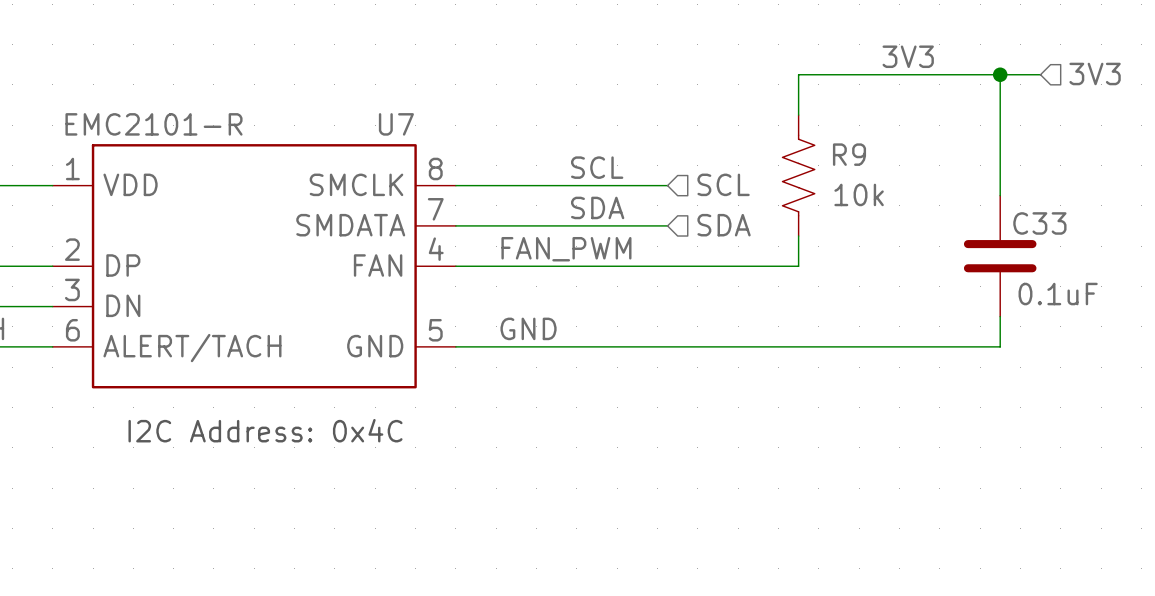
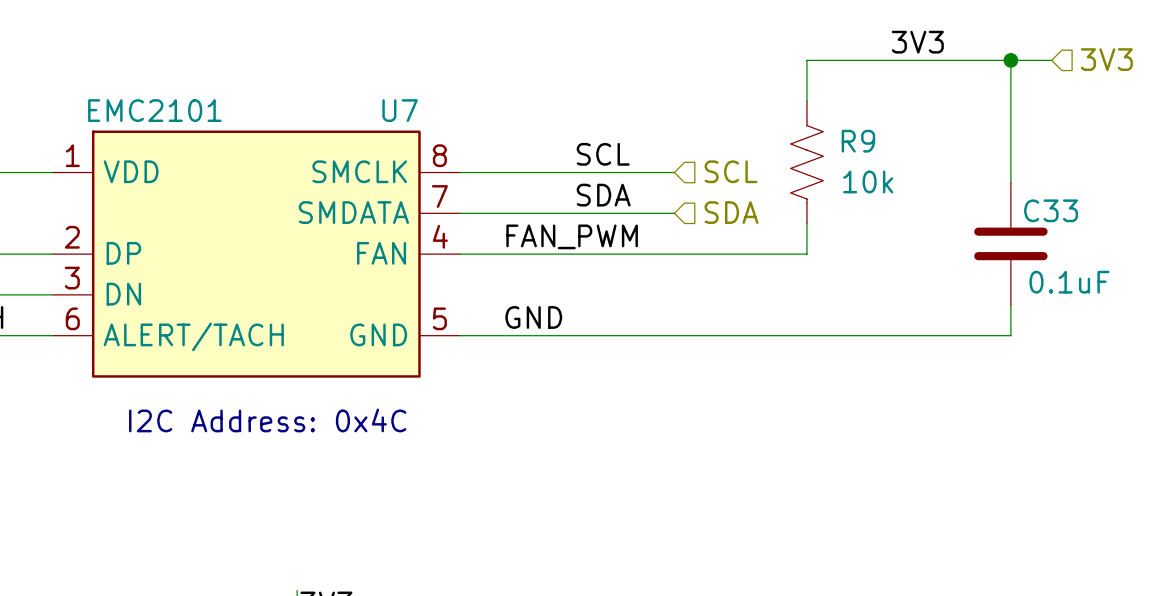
U7 value: EMC2101-R (153, 124) -> EMC2101 (154, 110)

